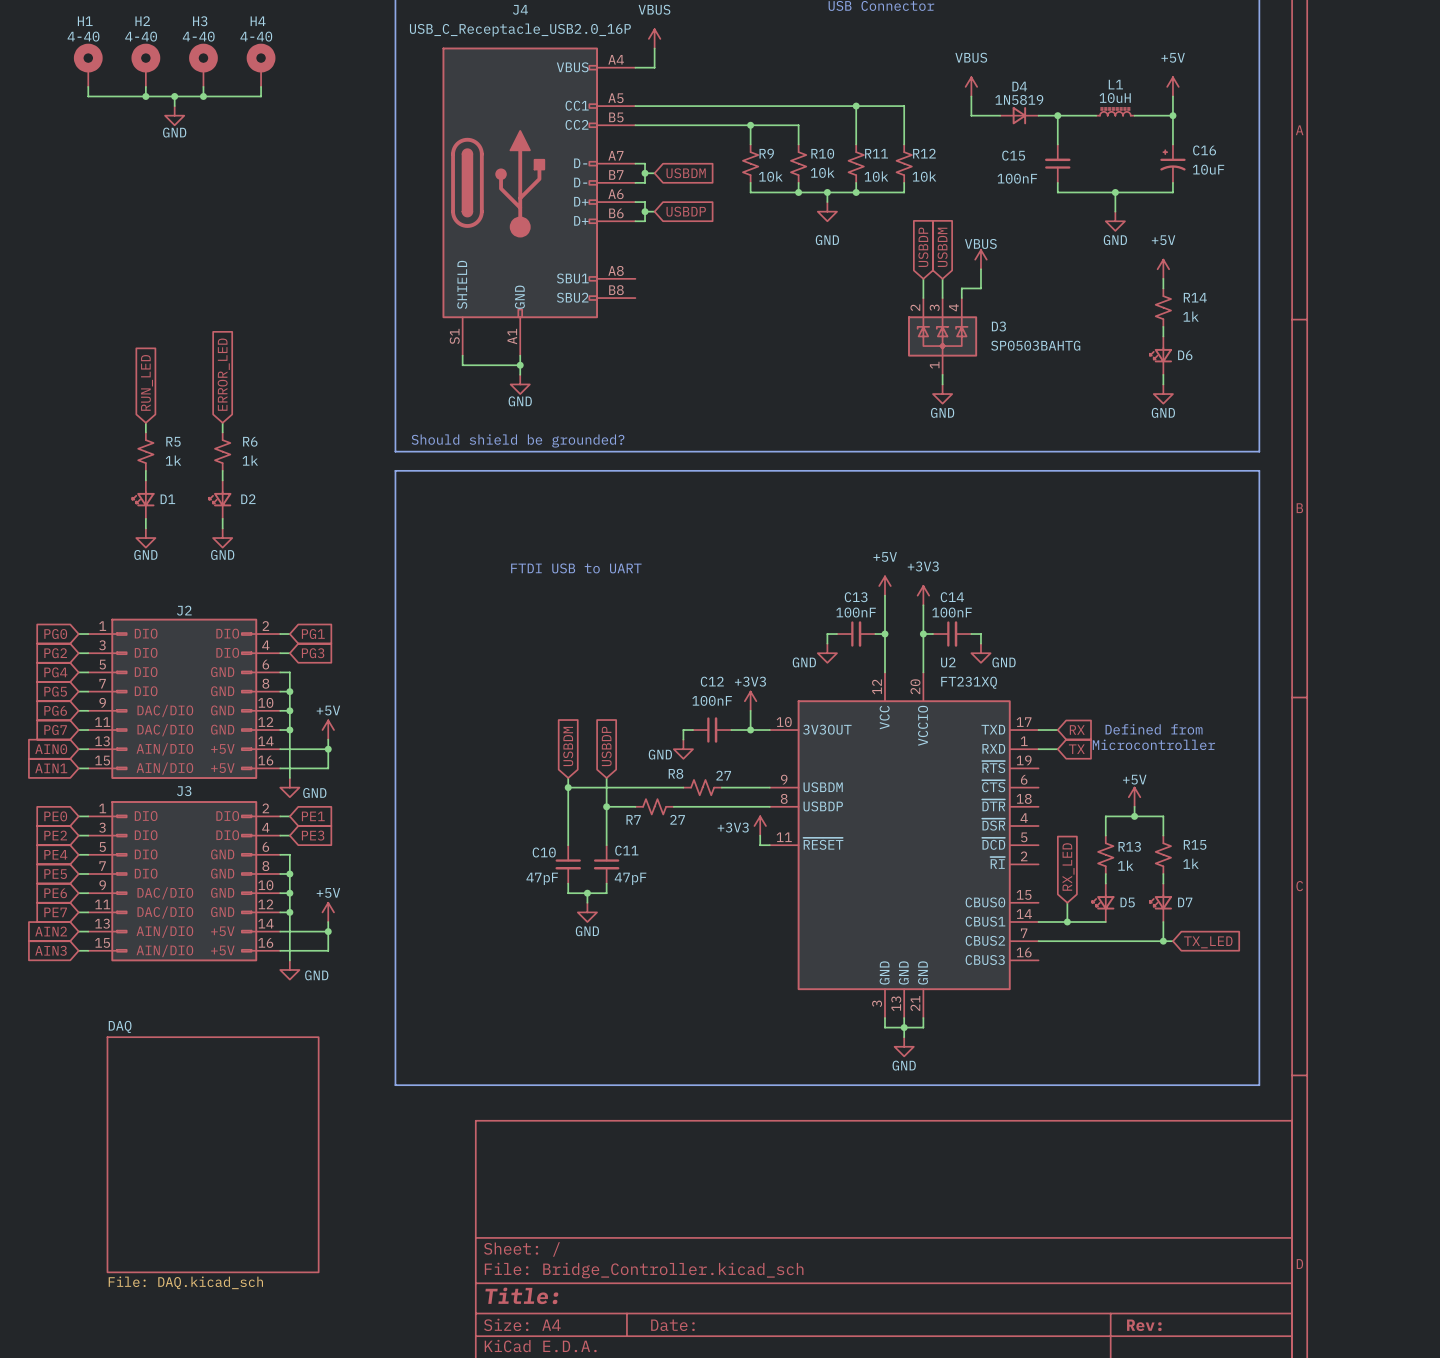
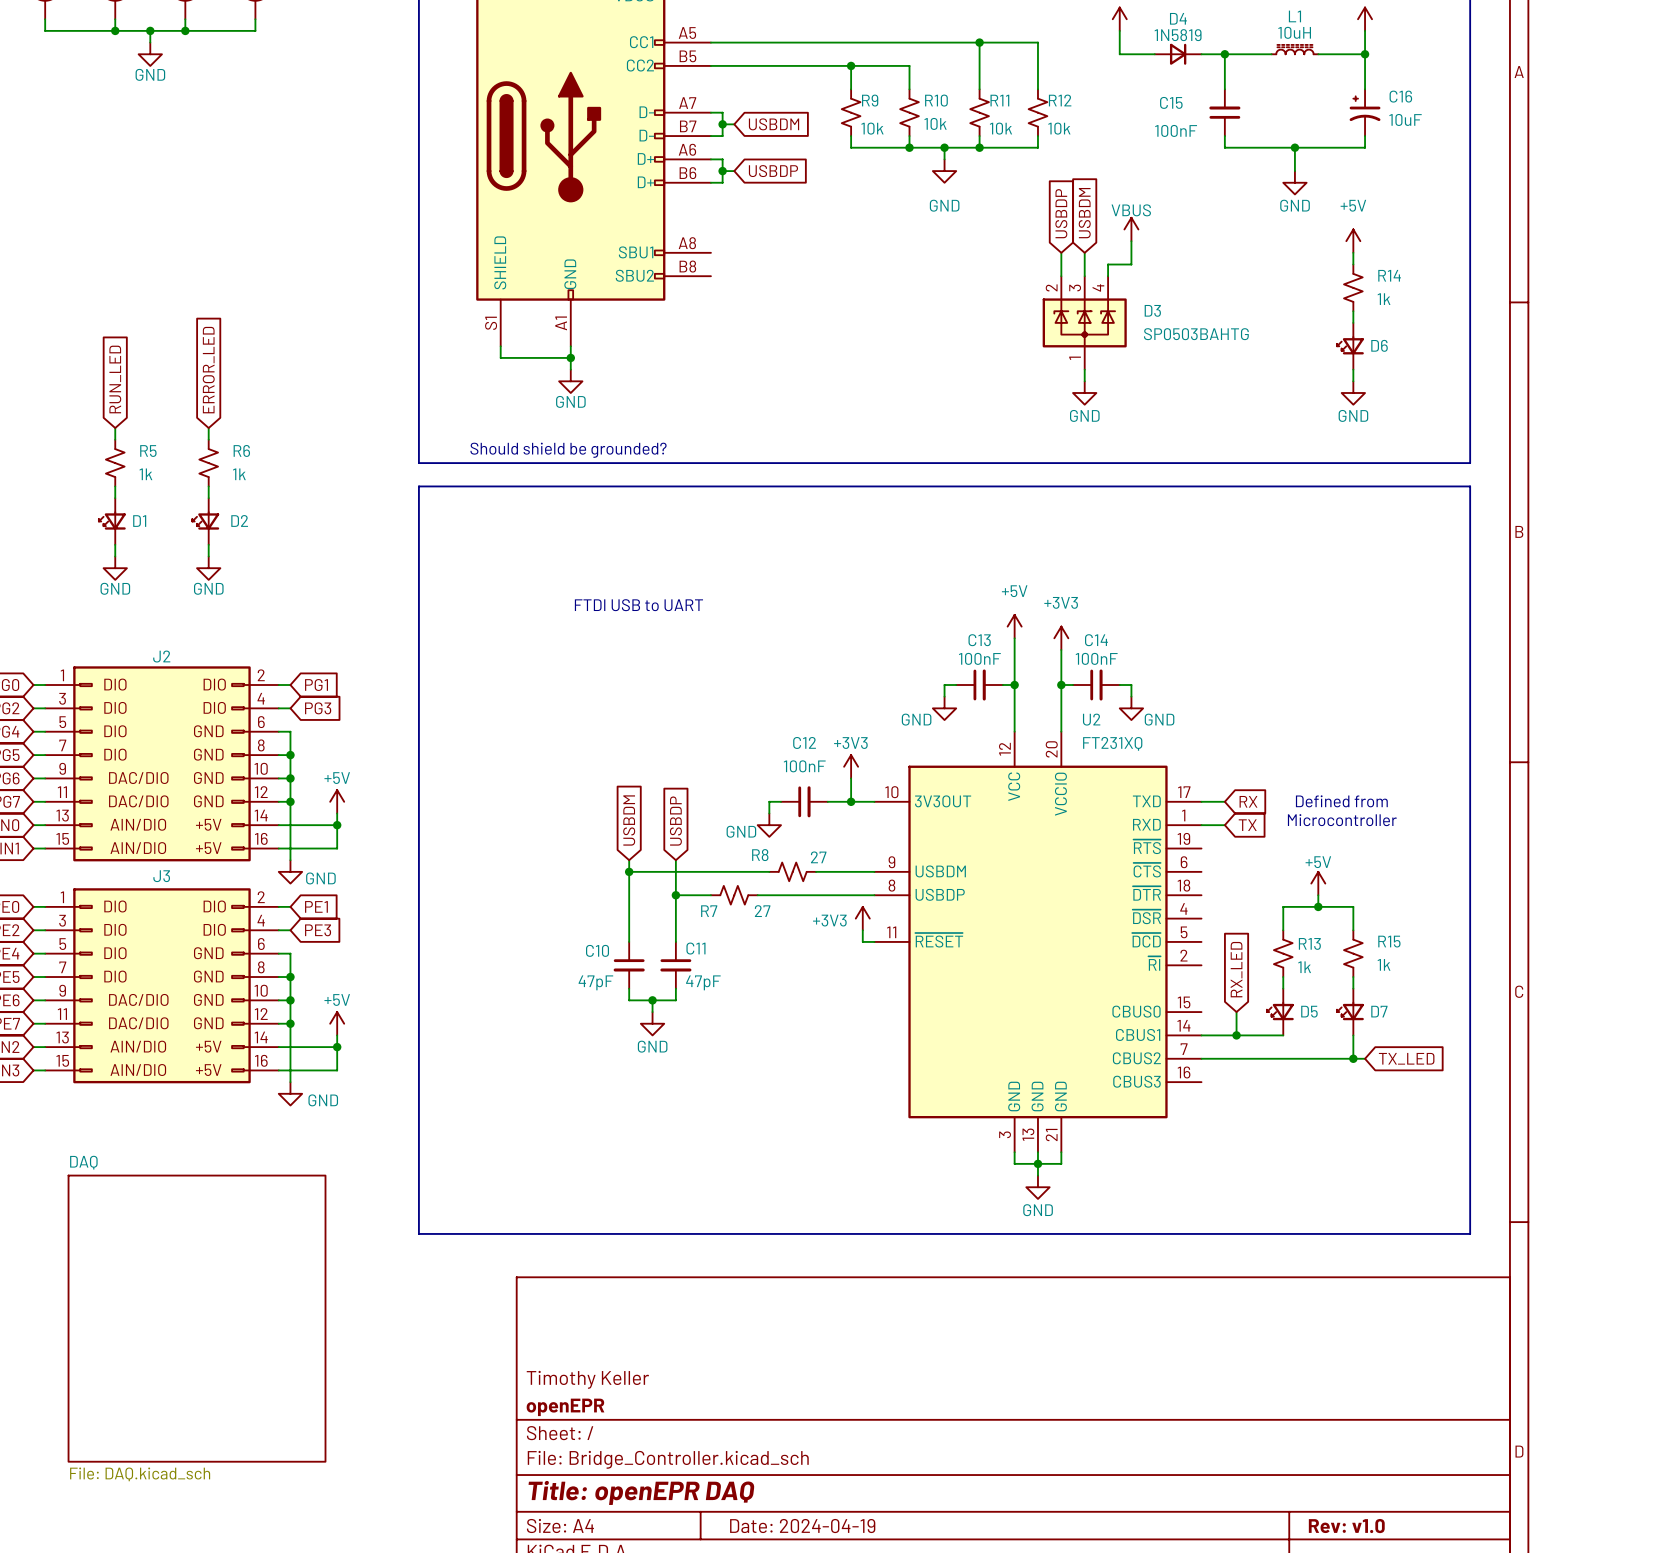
title block: none -> Timothy Keller (587, 1379)
title block: none -> openEPR (565, 1407)
title block: Title: (521, 1295) -> Title: openEPR DAQ (641, 1492)
title block: Date: (672, 1325) -> Date: 2024-04-19 (802, 1526)
title block: Rev: (1144, 1325) -> Rev: v1.0 (1346, 1526)

